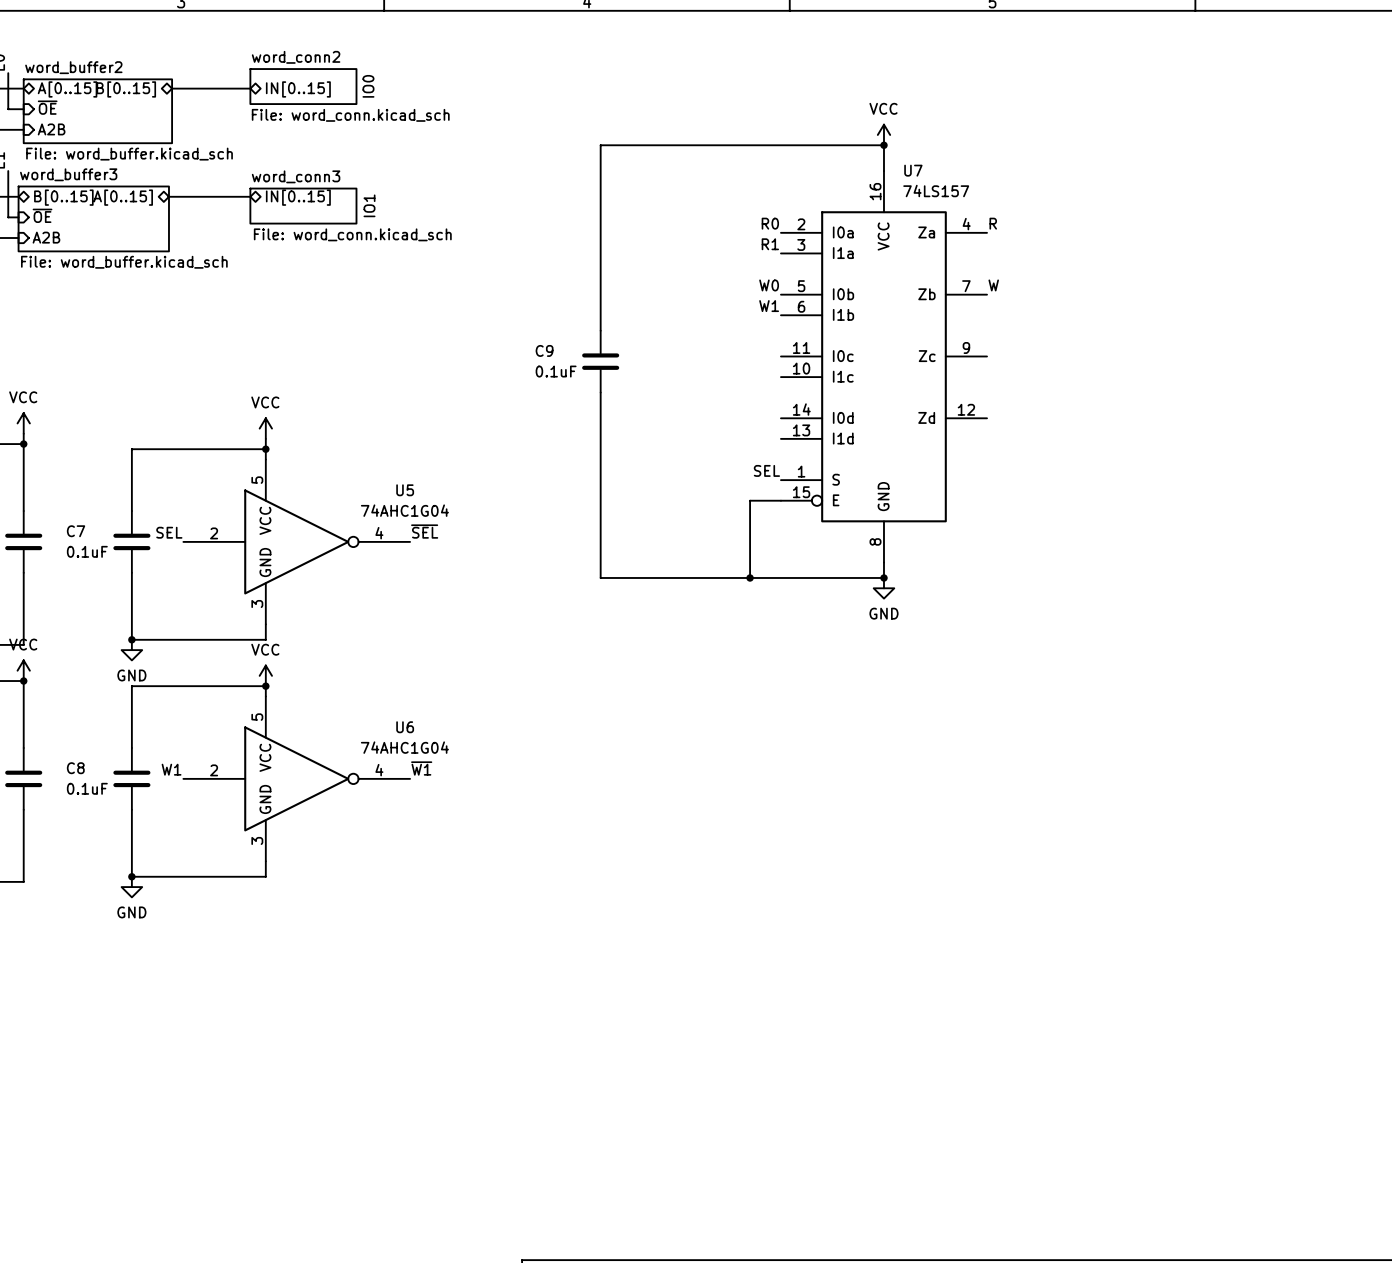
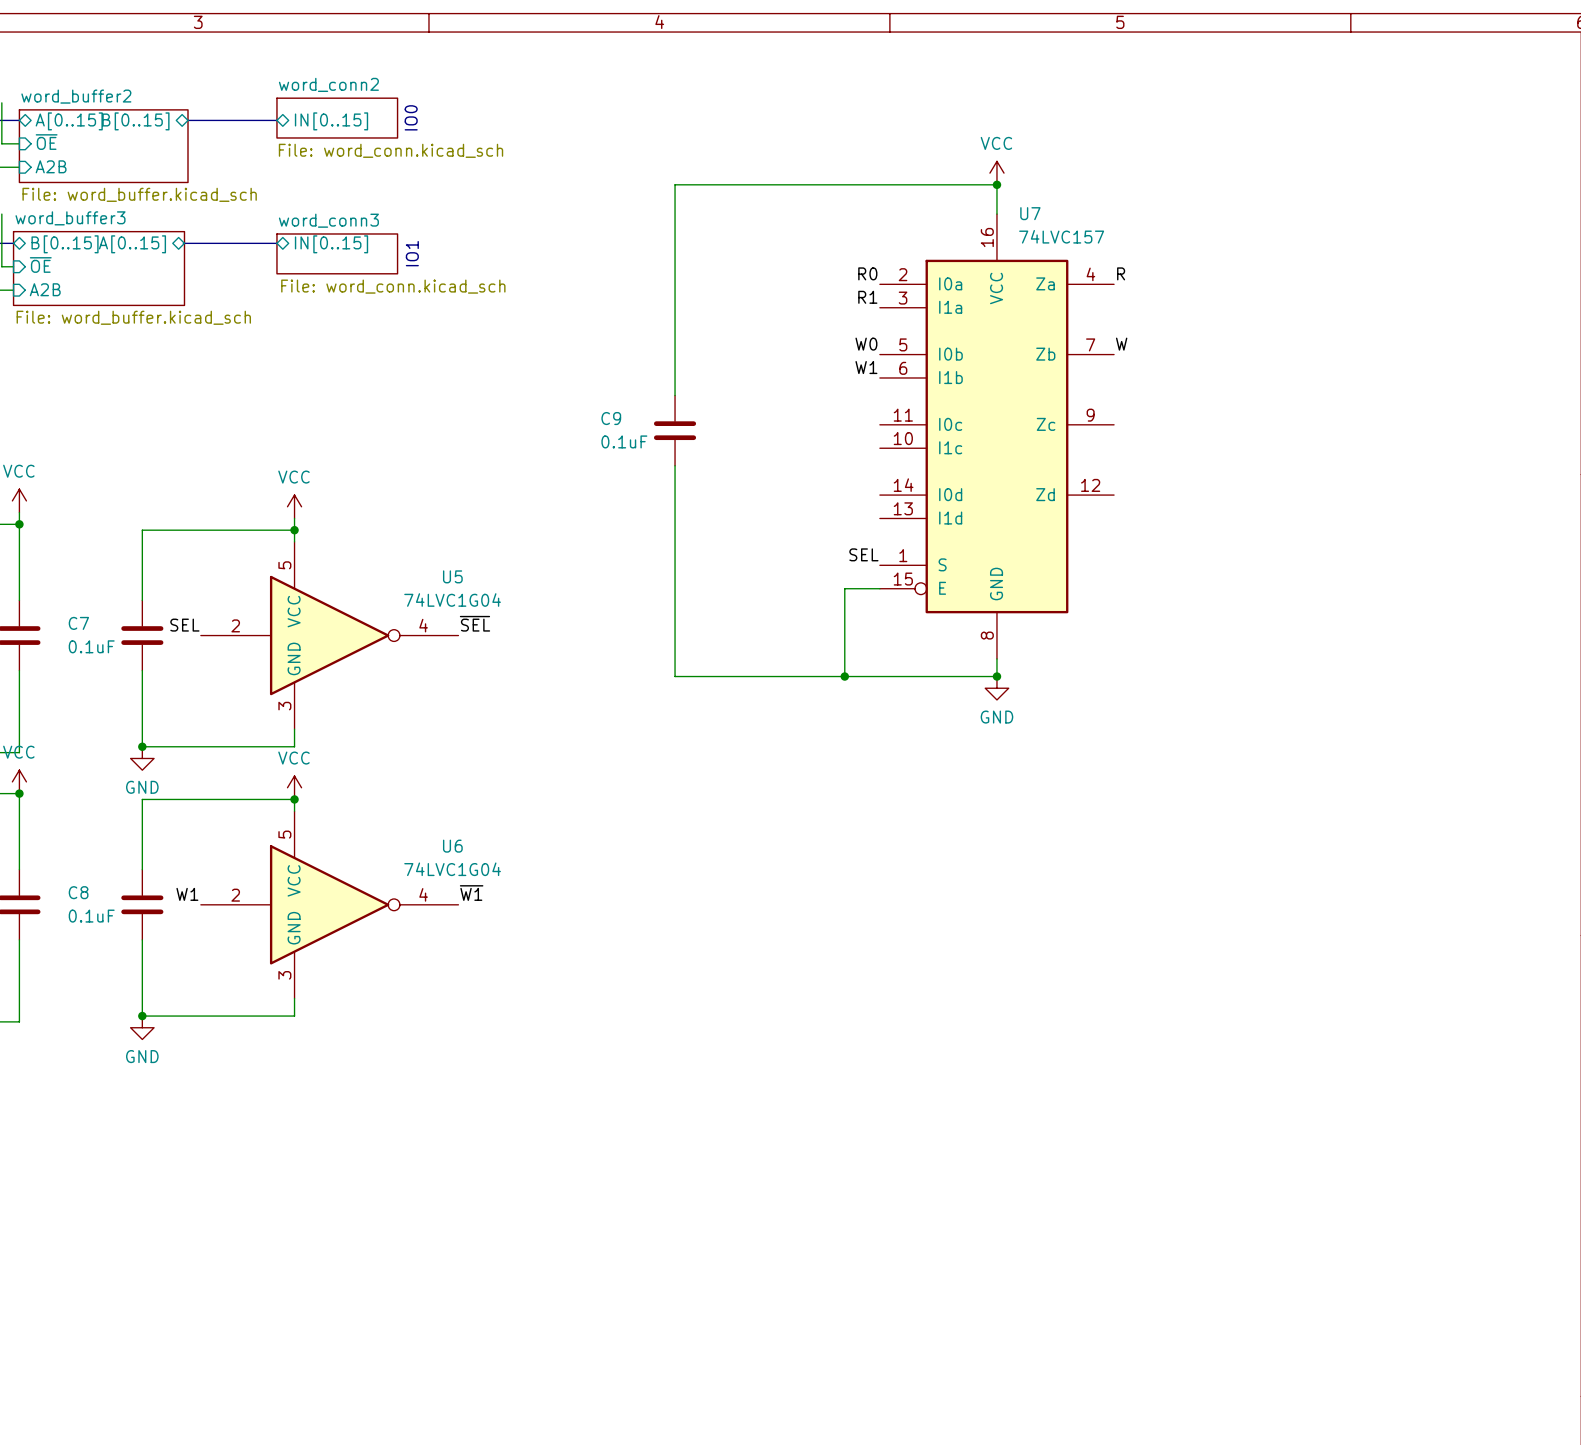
U7 value: 74LS157 (936, 191) -> 74LVC157 (1061, 236)
U5 value: 74AHC1G04 (404, 510) -> 74LVC1G04 (452, 600)
U6 value: 74AHC1G04 (404, 747) -> 74LVC1G04 (452, 869)

